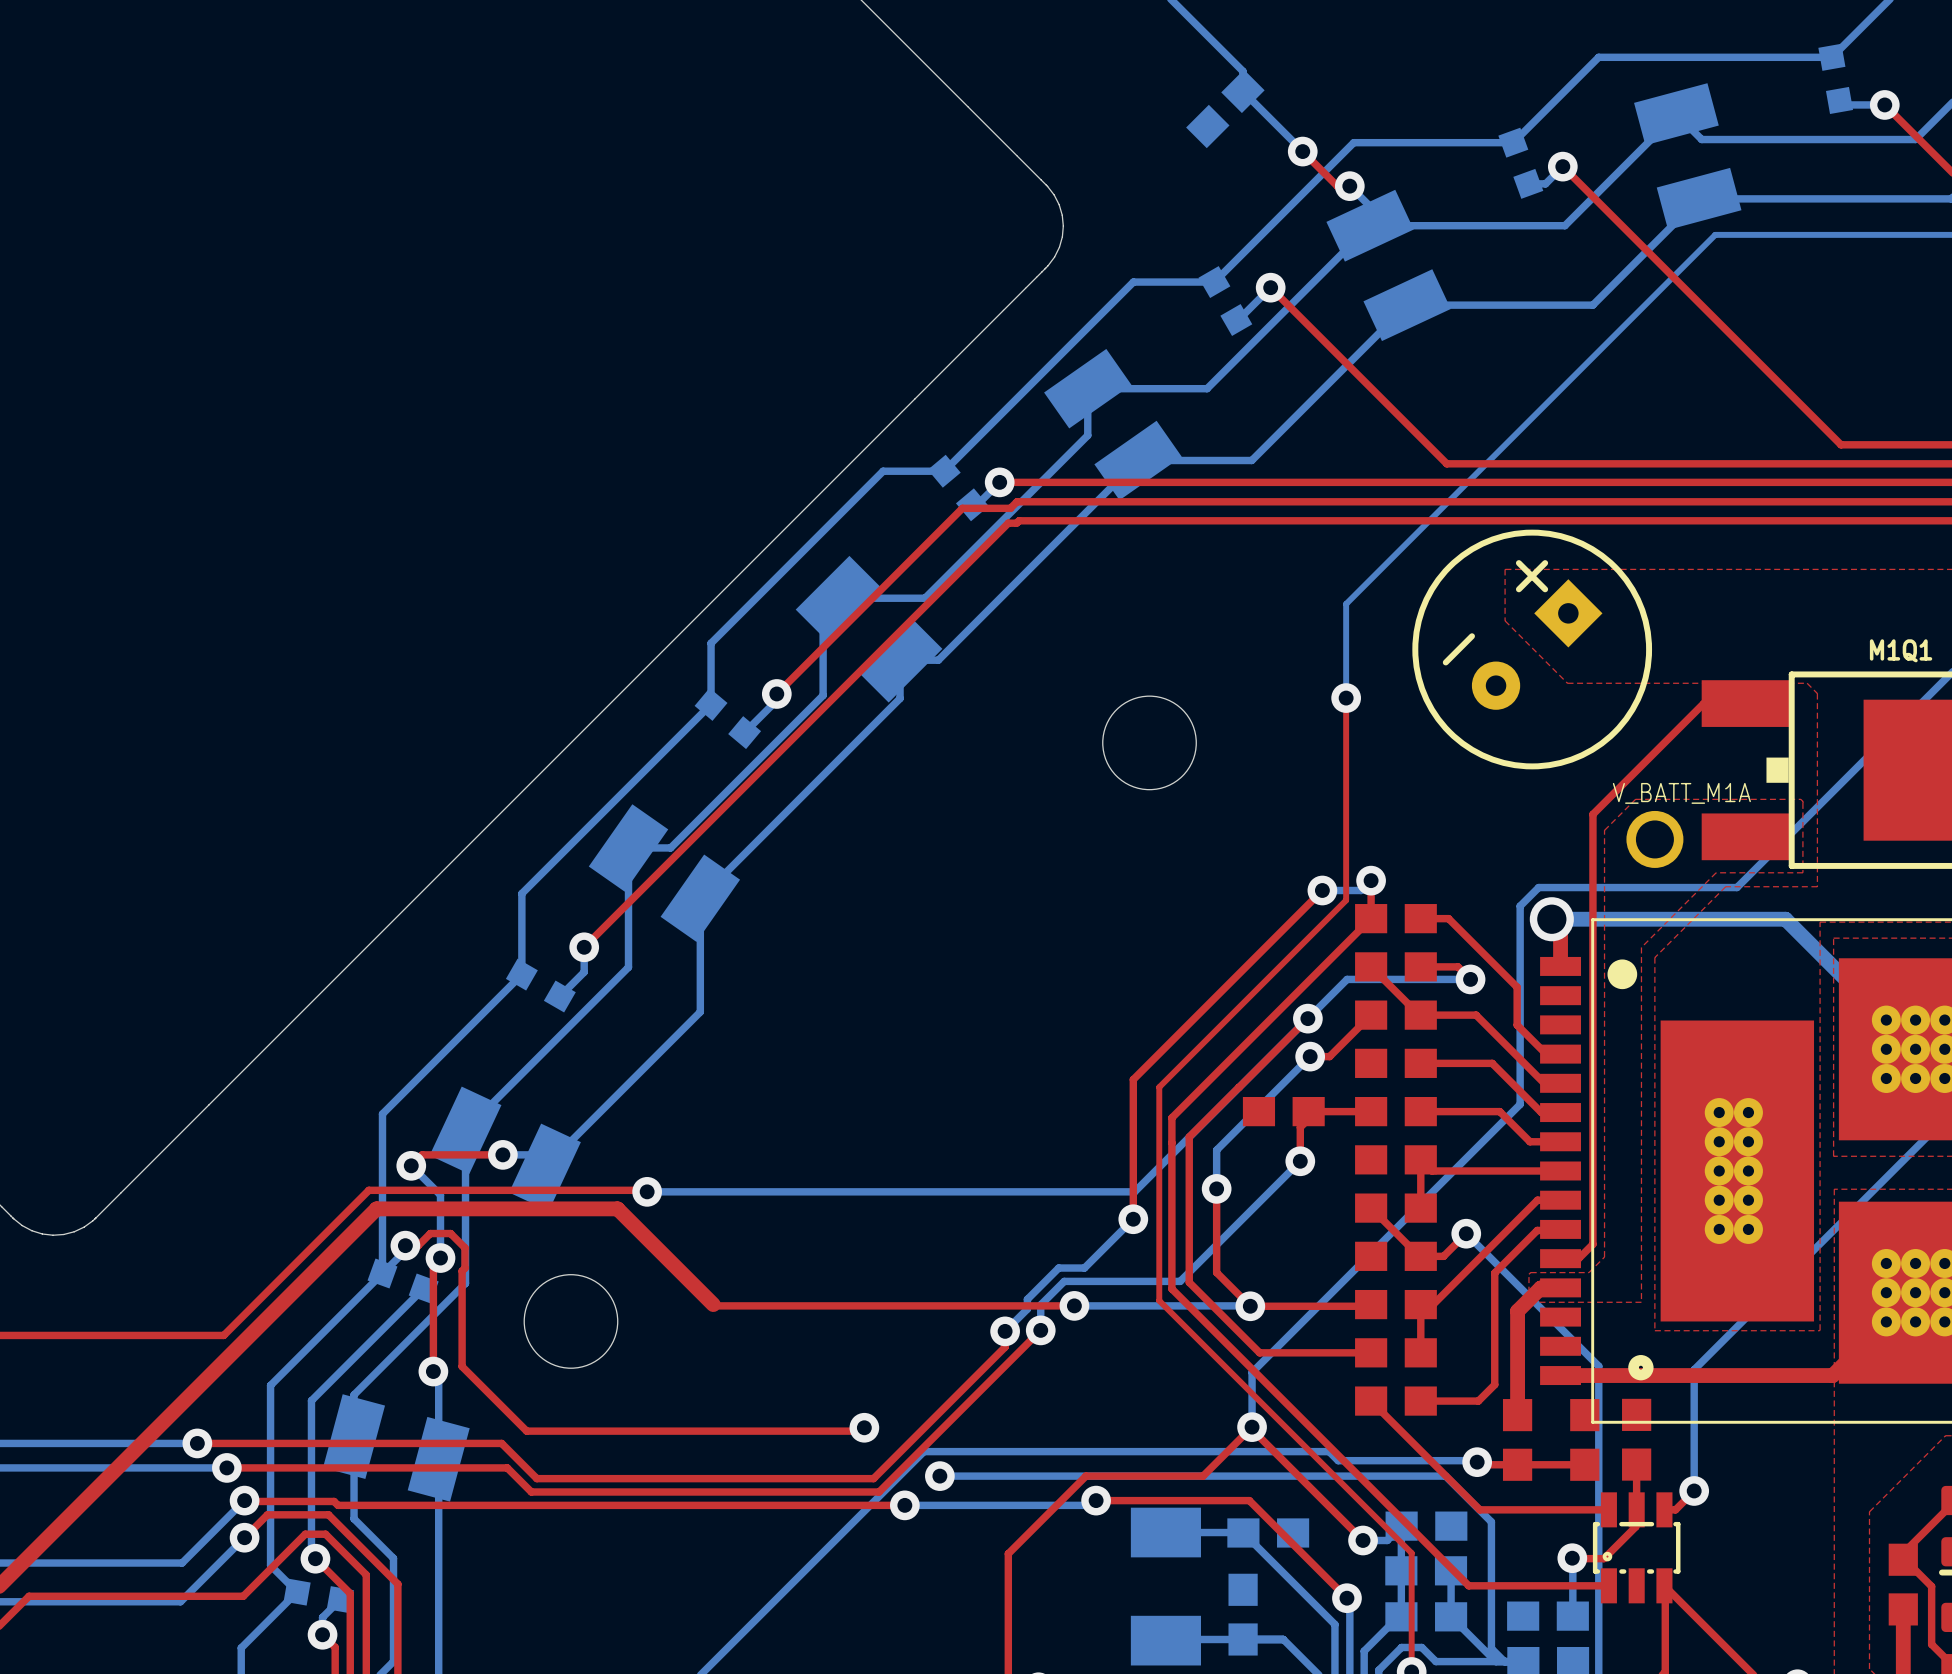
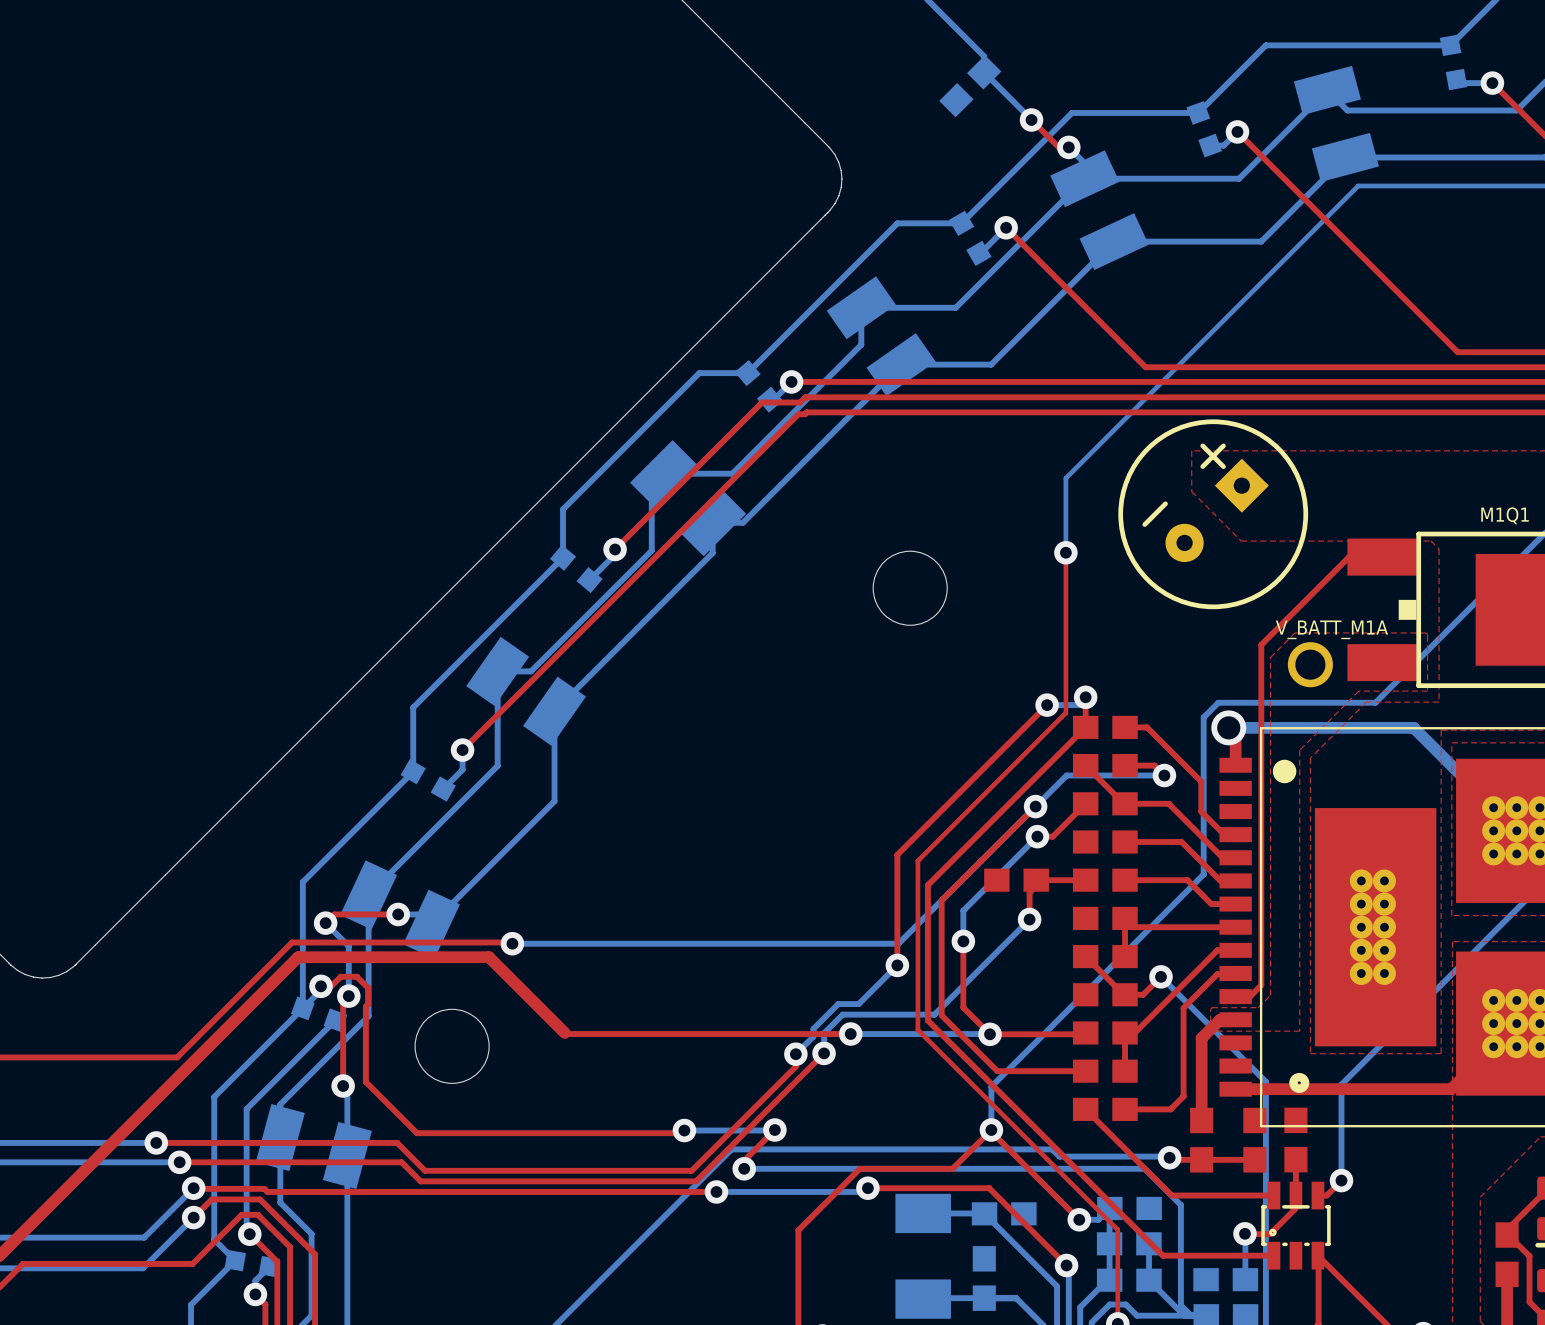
top track: none -> (774, 1130) (744, 1160) (744, 1168)
bottom track: none -> (774, 1130) (684, 1130)
via: none -> (774, 1130)

